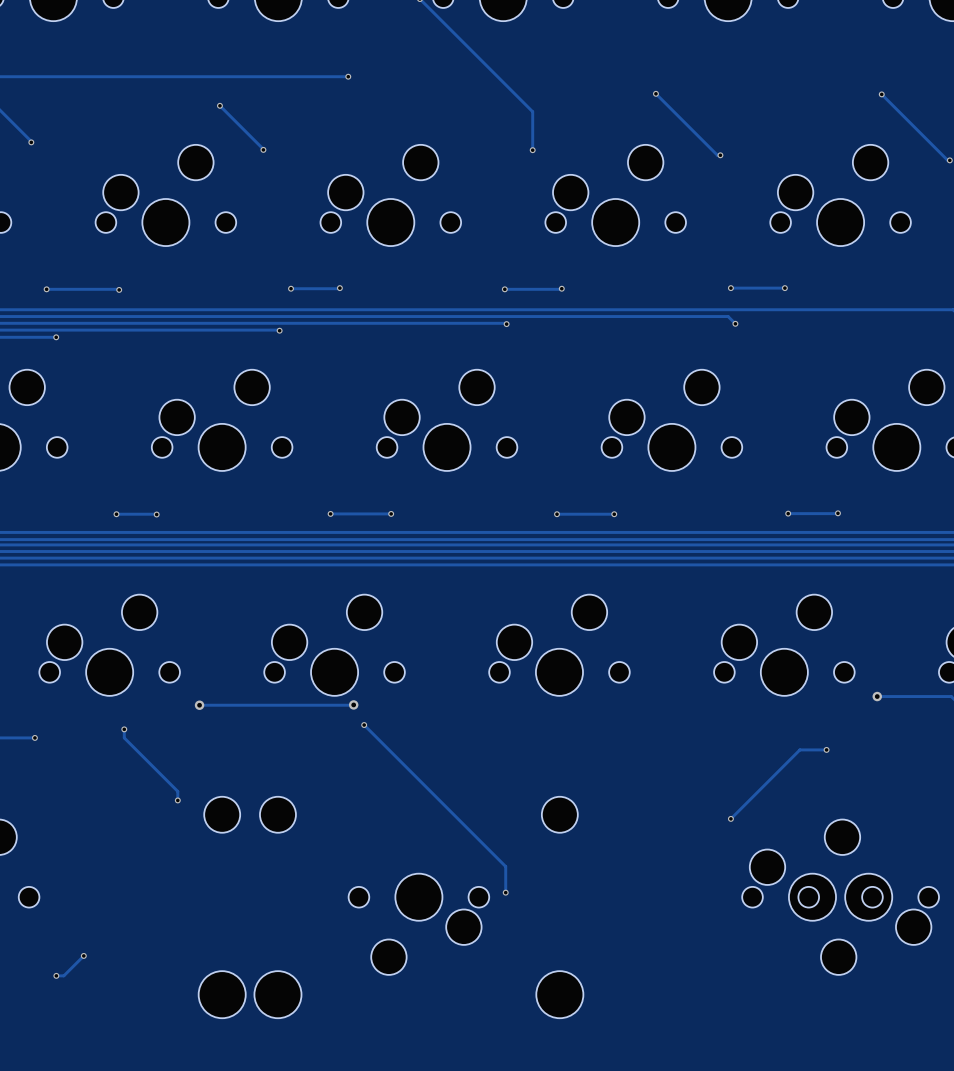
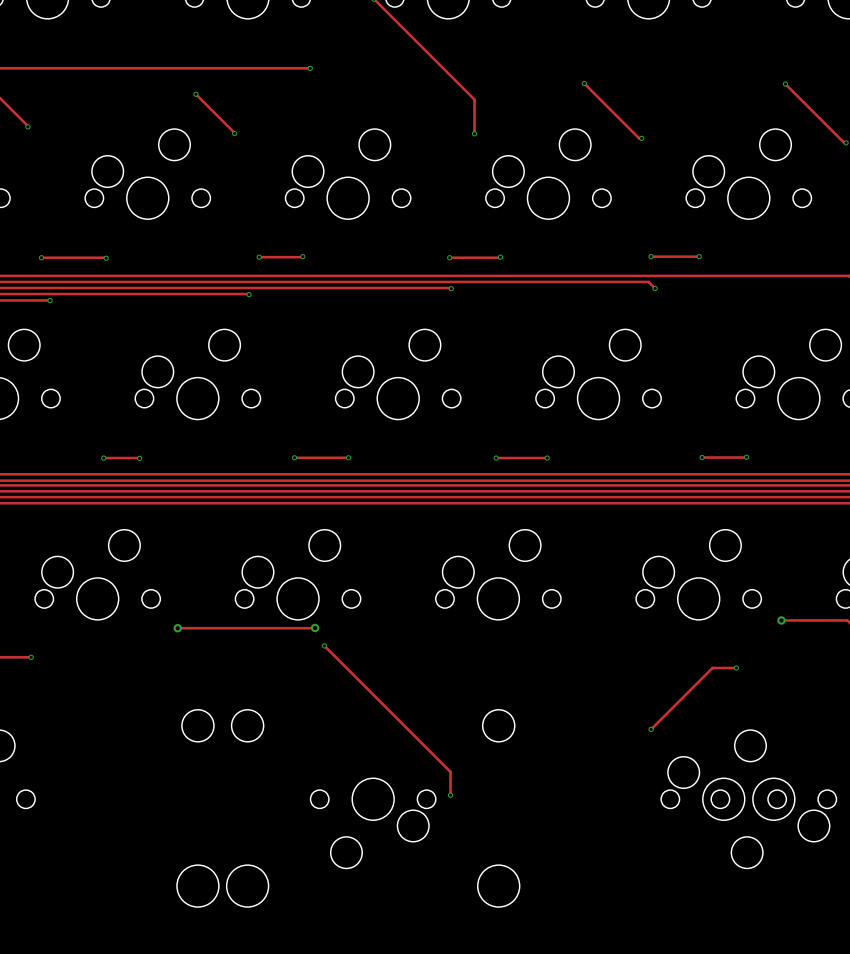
track: (124, 729) (124, 737) (177, 791) (177, 800) -> none
via: (124, 729) -> none
via: (177, 800) -> none
track: (83, 955) (63, 975) (56, 975) -> none
via: (83, 955) -> none
via: (56, 975) -> none

